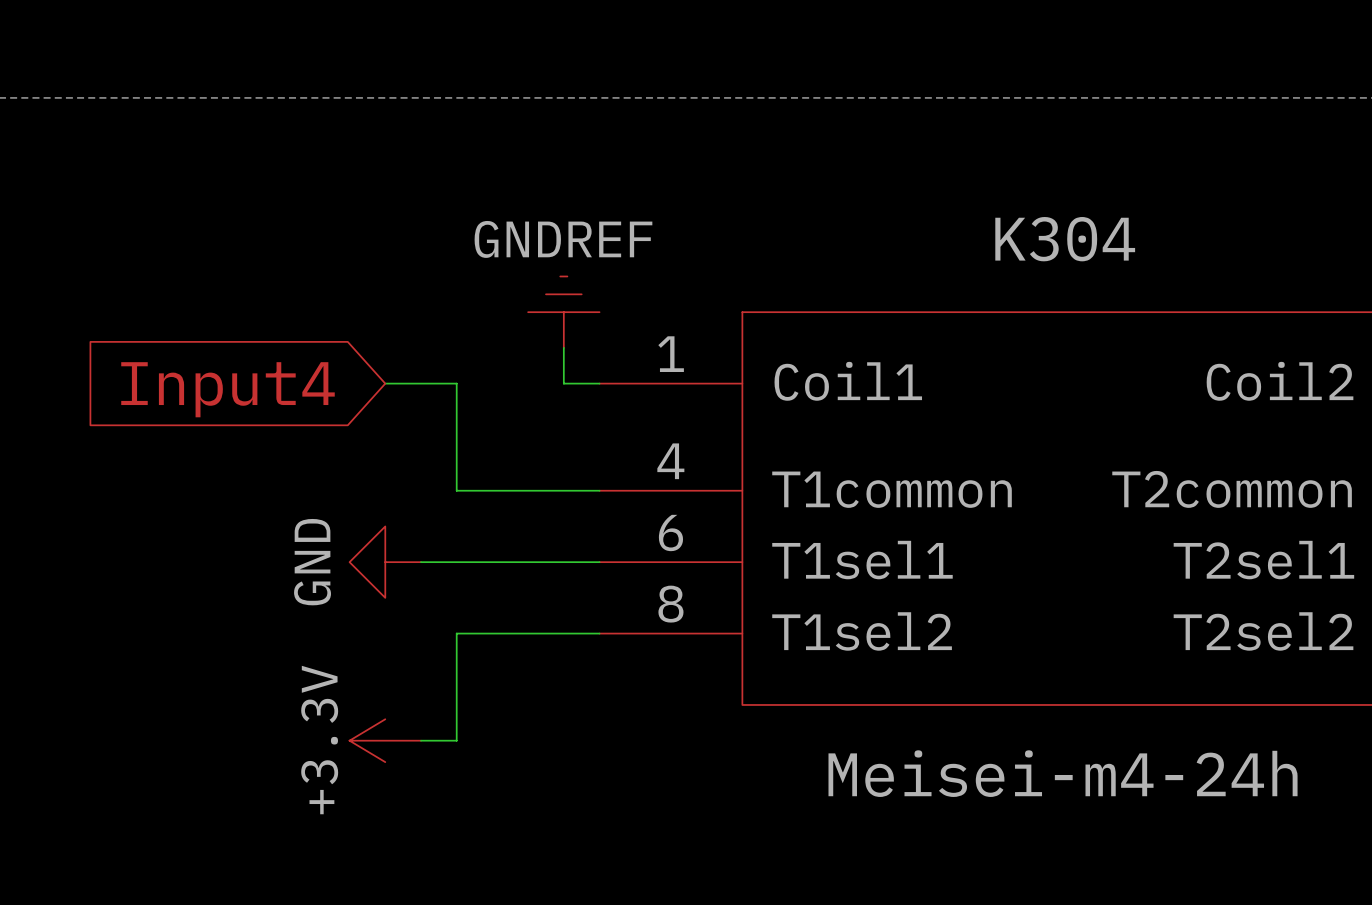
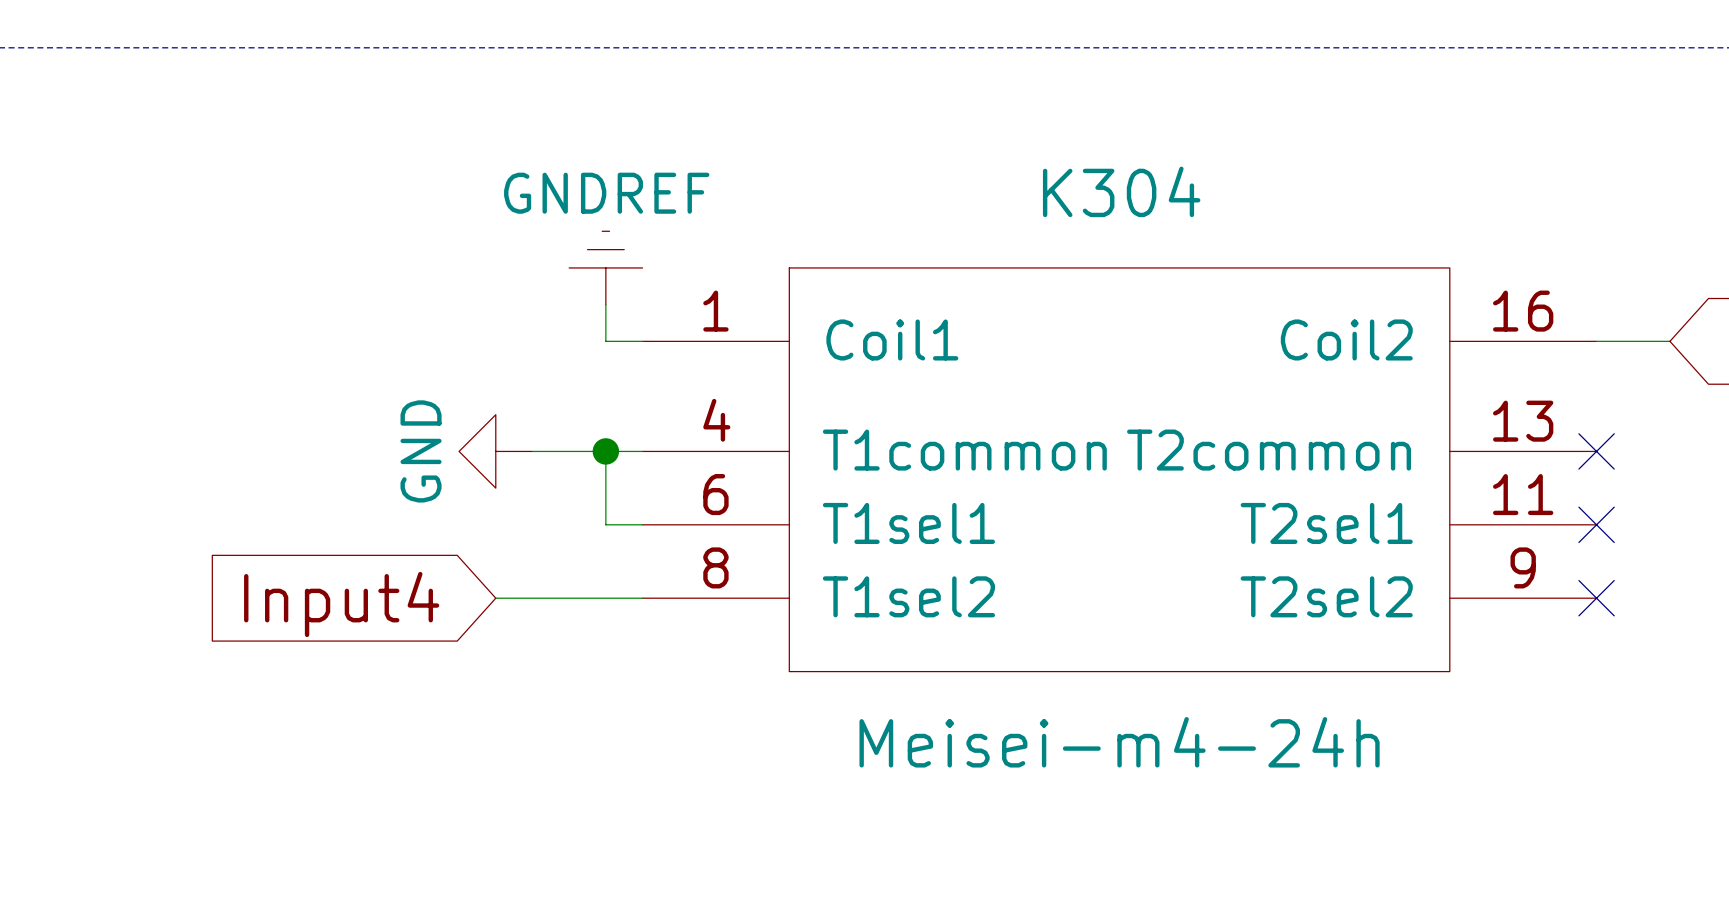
wire: (385, 383) (456, 383) (456, 490) (492, 490) -> none
global label position: Input4 (227, 389) -> Input4 (341, 604)
junction: none -> (605, 451)
power symbol position: GND (385, 562) -> GND (495, 451)
wire: (420, 562) (563, 562) -> (605, 451) (605, 524)
wire: (456, 633) (456, 740) (420, 740) -> none
power symbol: +3.3V (385, 740) -> none

